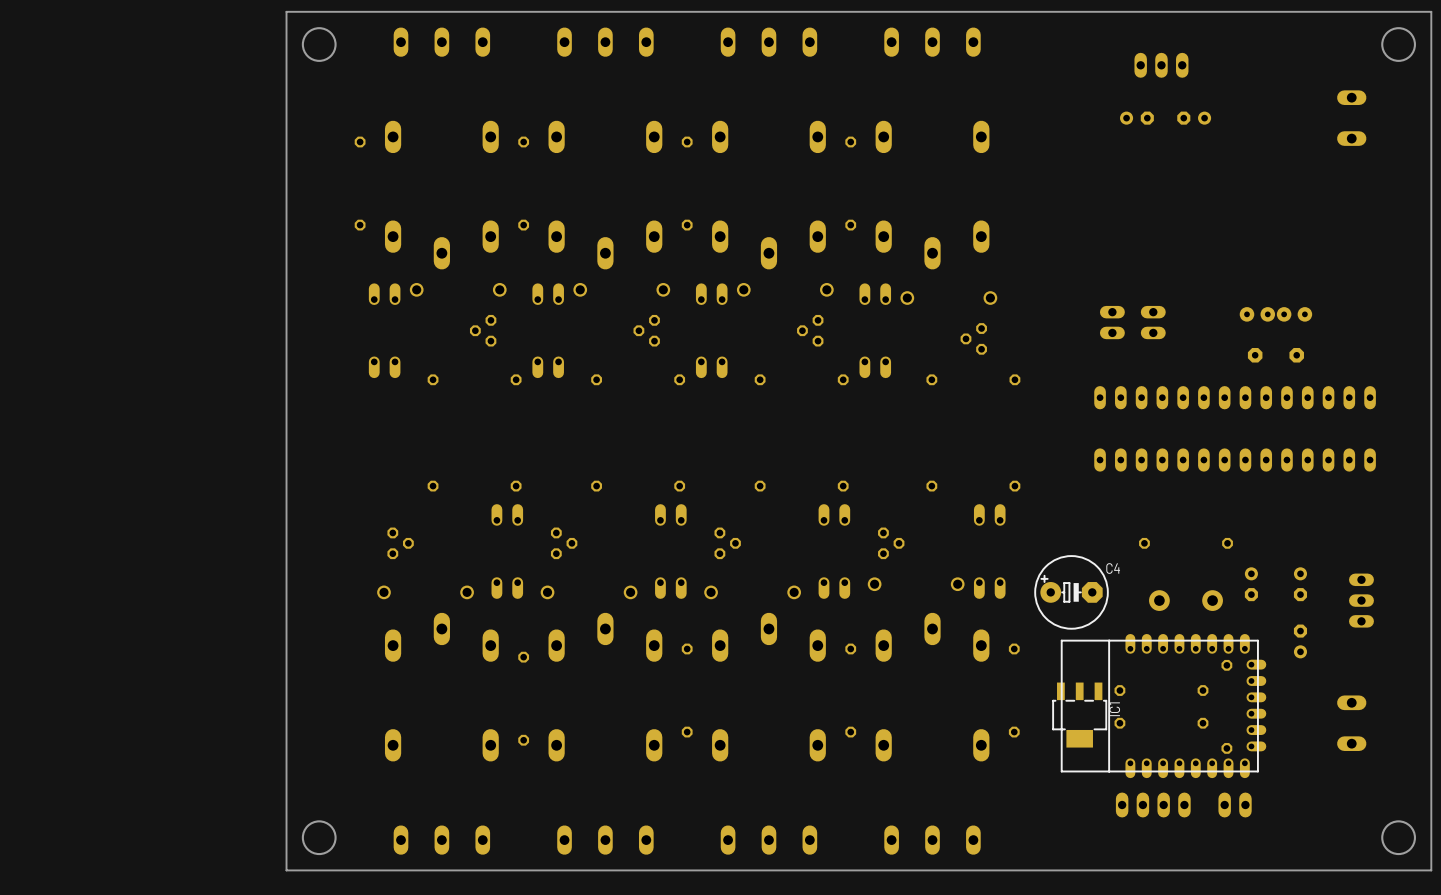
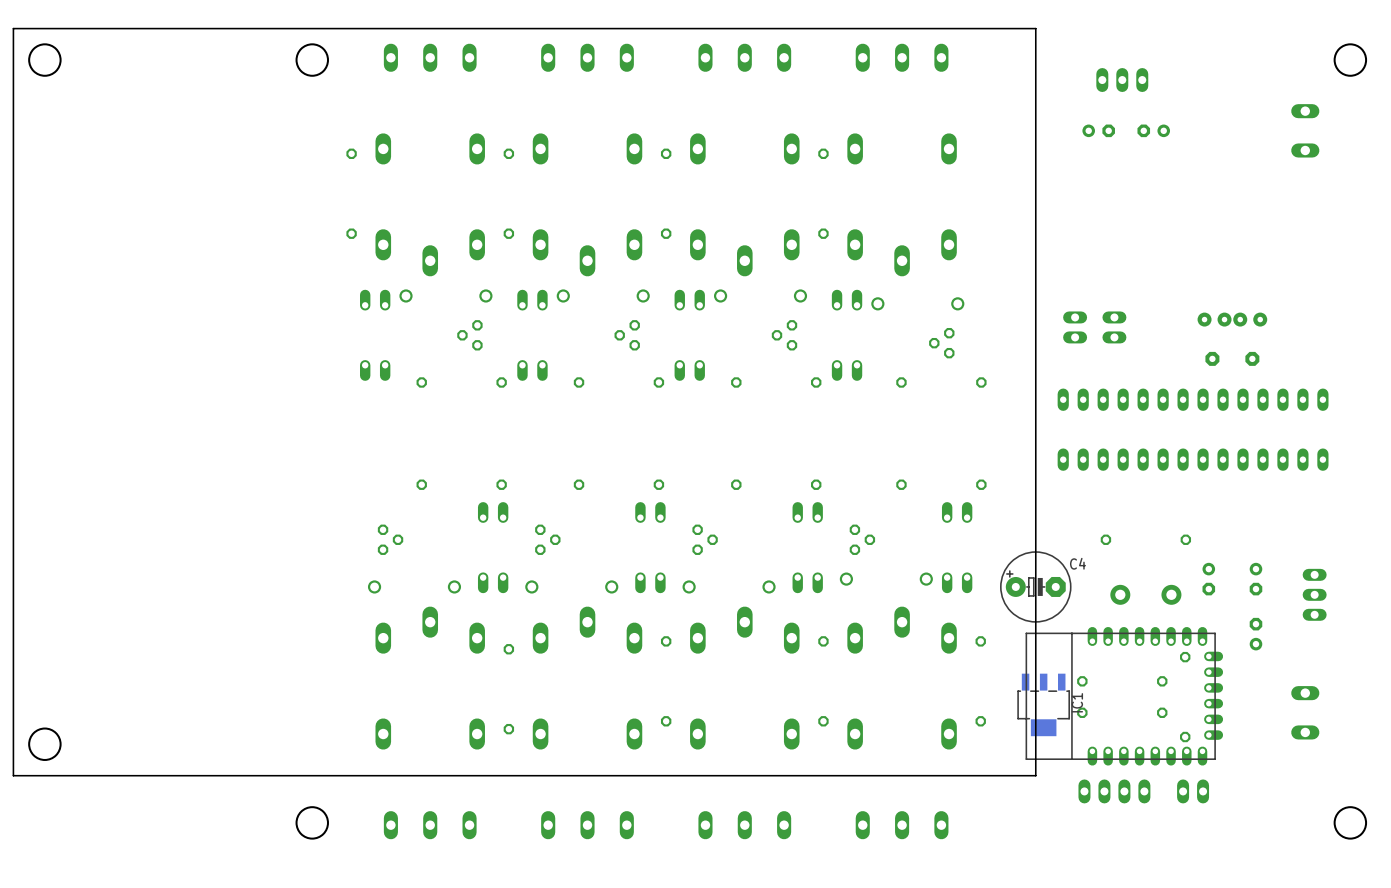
board edge: (1071, 11) (1431, 11) (1431, 870) (286, 870) (286, 11) -> (1035, 28) (1035, 775) (13, 775) (13, 28) (280, 28)
round board edge: none -> [28, 43, 62, 77]
round board edge: none -> [28, 727, 62, 761]

